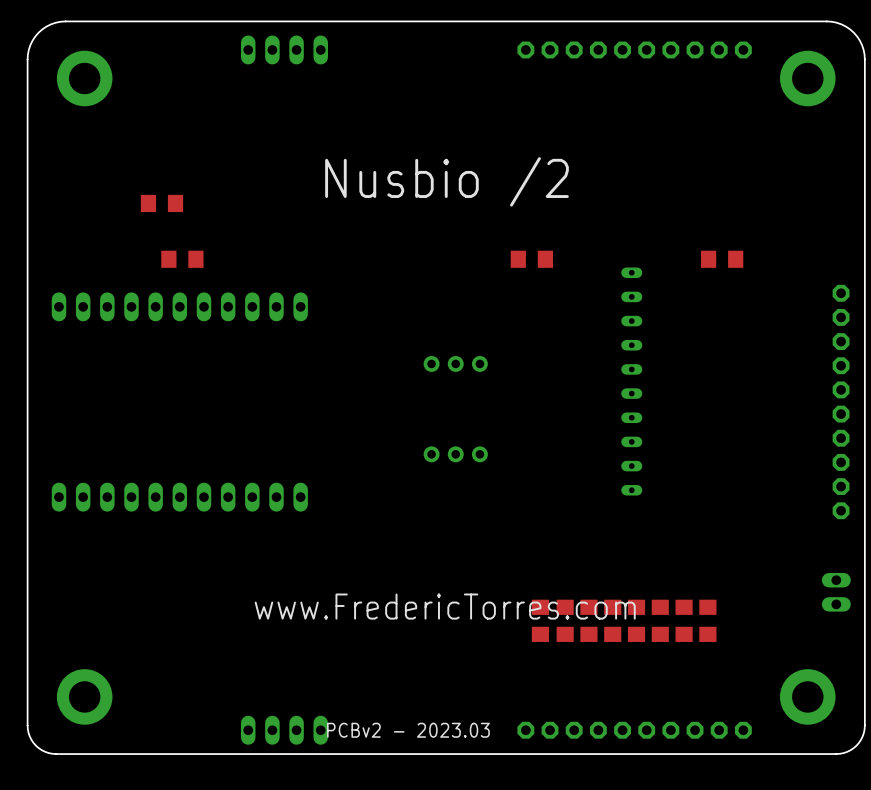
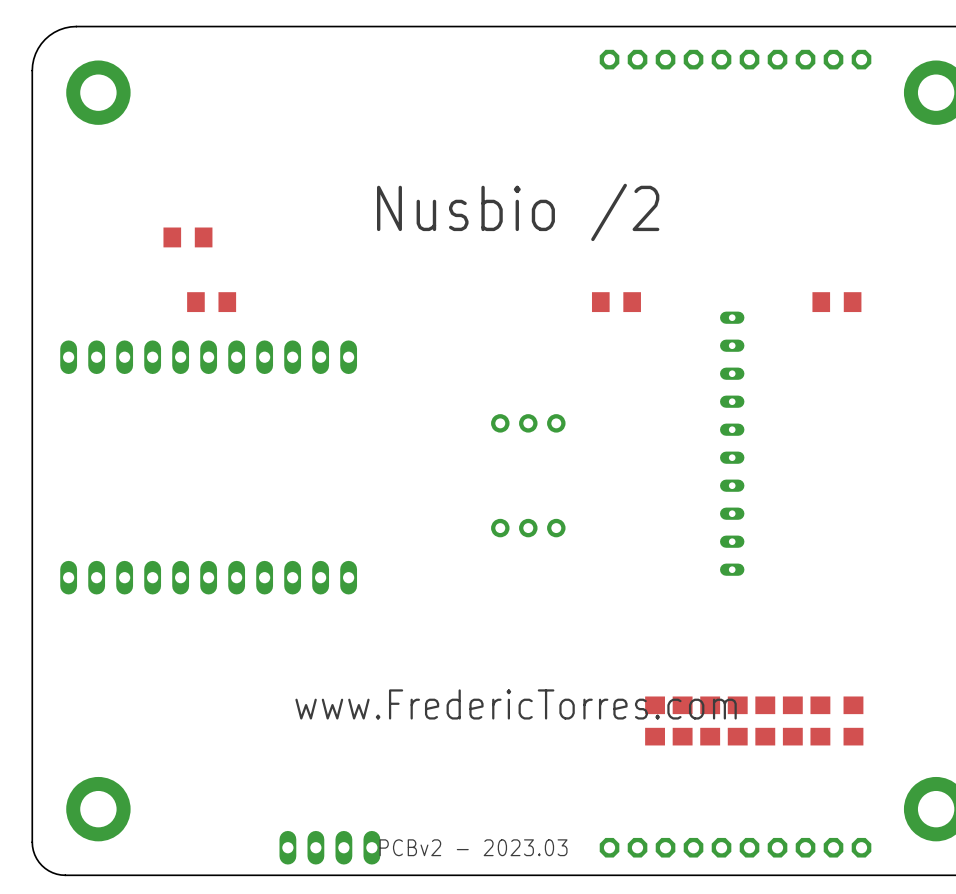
part: (284, 49) -> none
part position: (540, 620) -> (853, 720)

